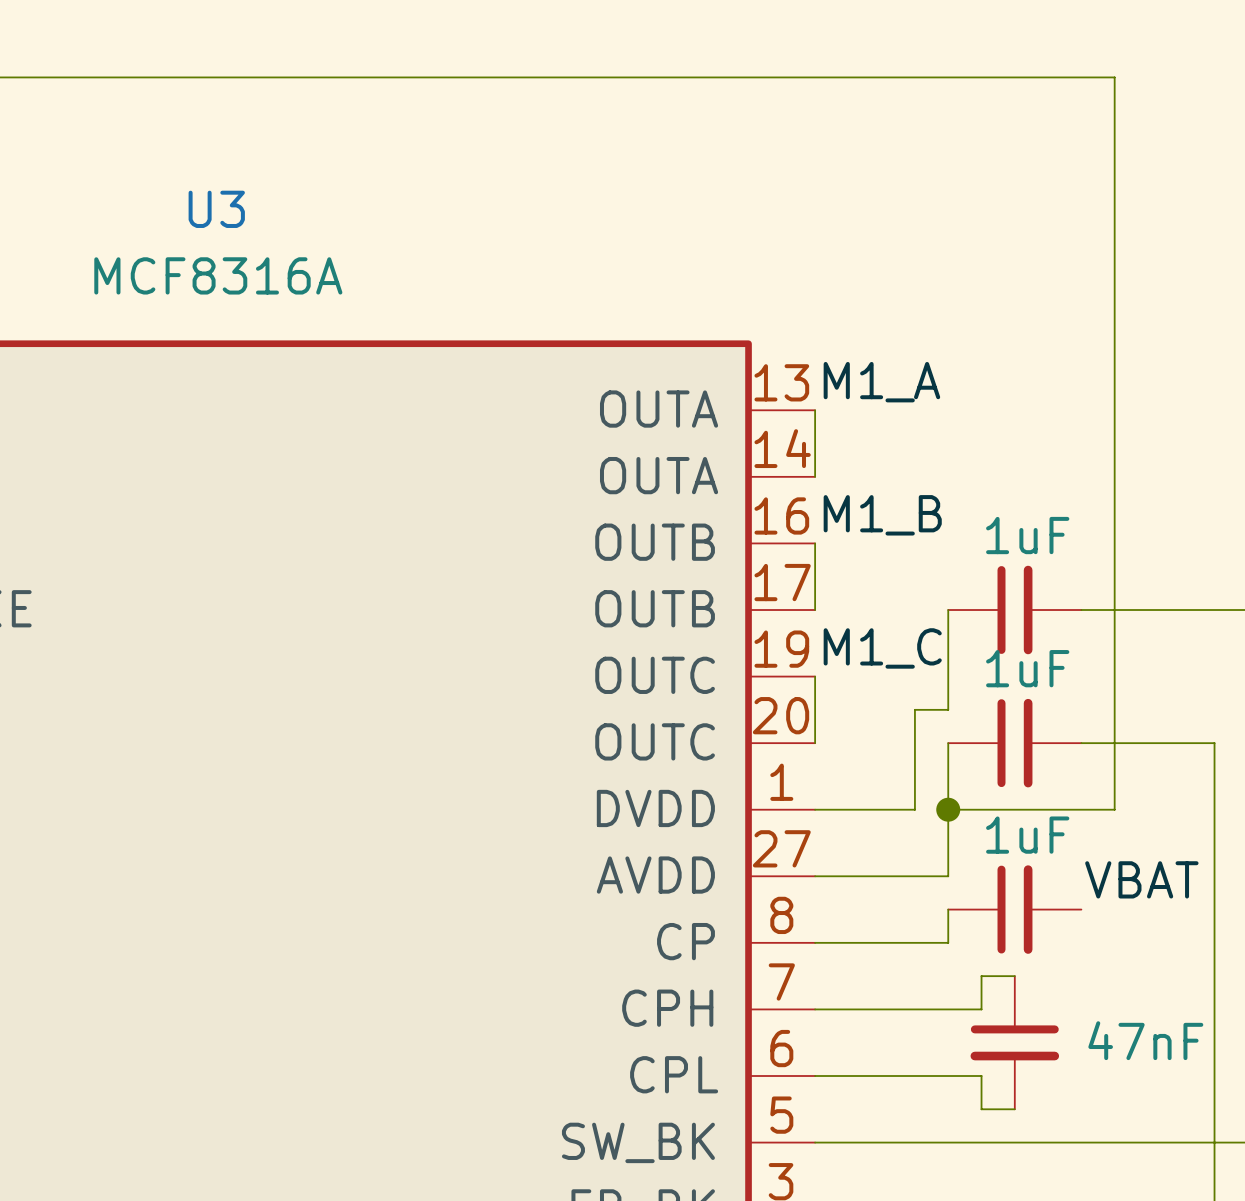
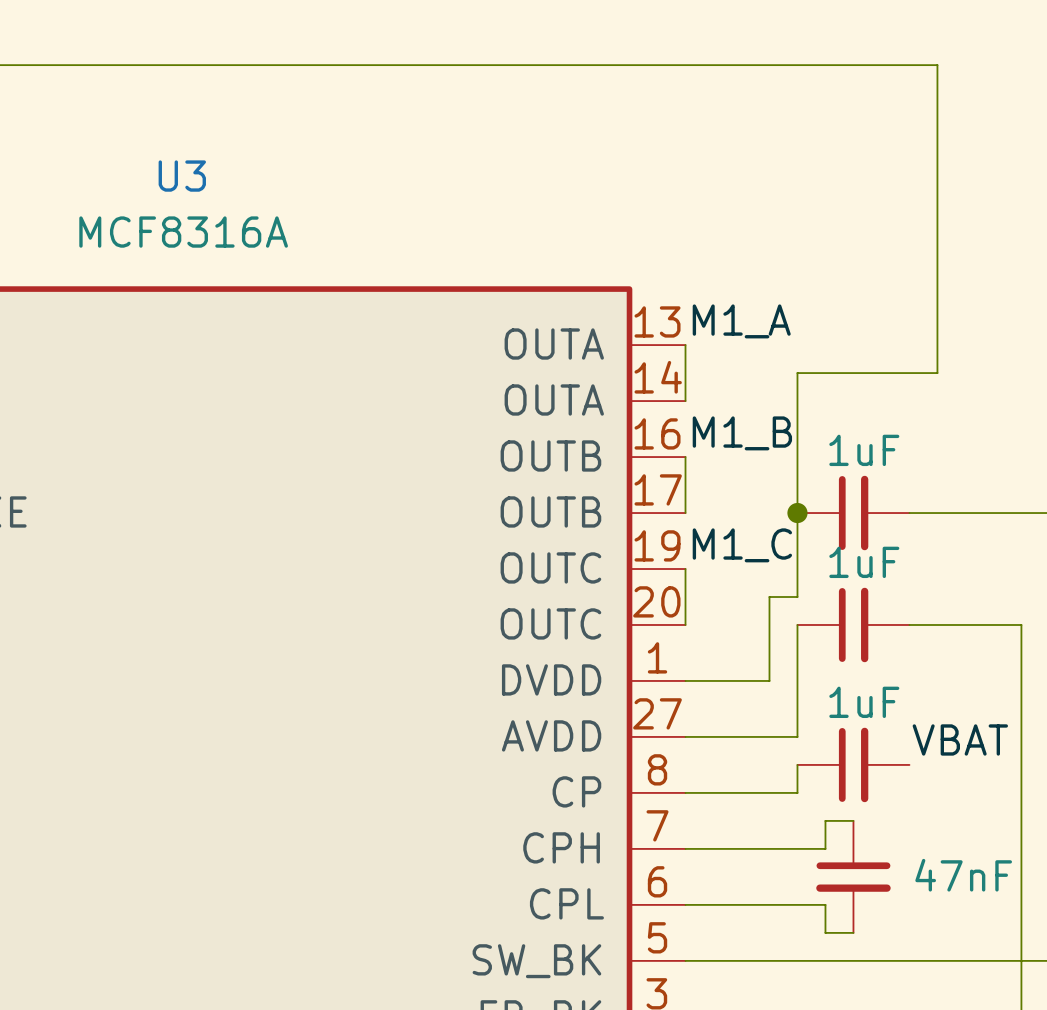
wire: (1114, 443) (1114, 809) (948, 809) -> (937, 373) (797, 373) (797, 513)
junction: none -> (797, 513)
junction: (948, 809) -> none

